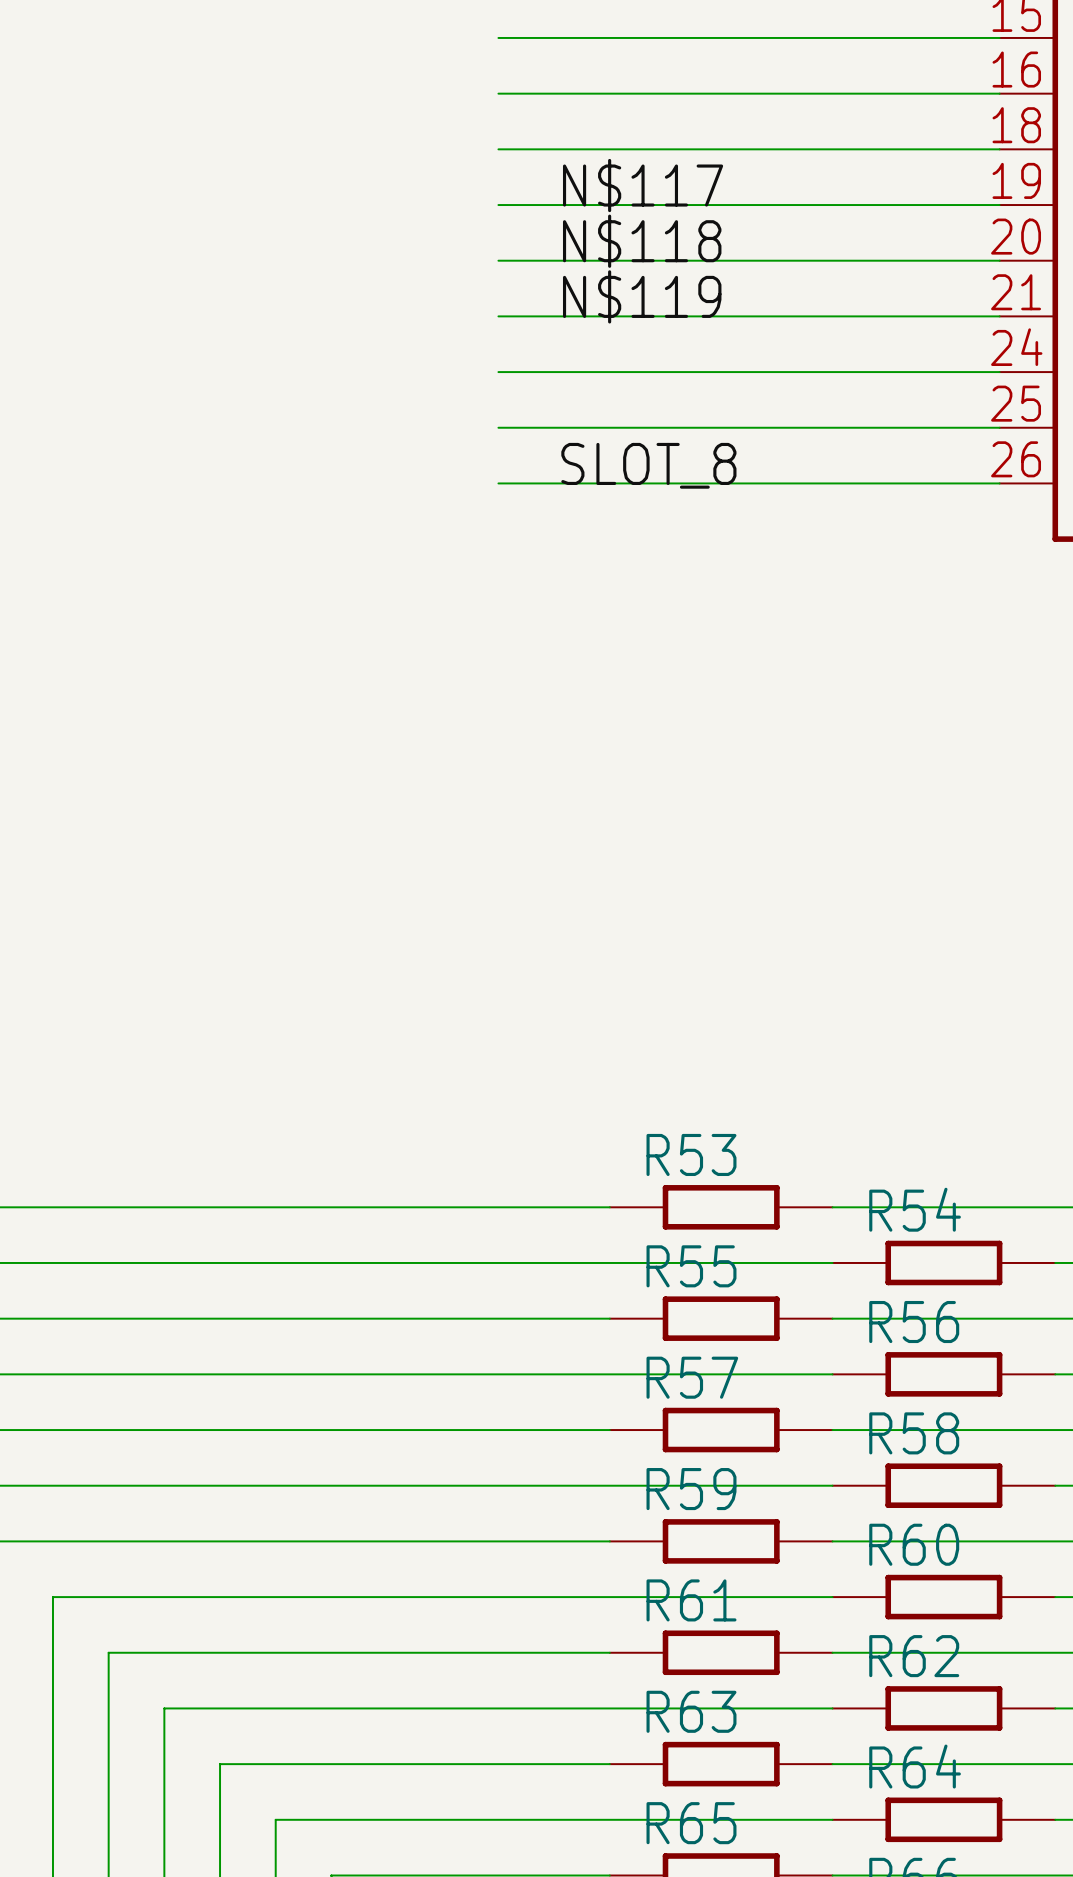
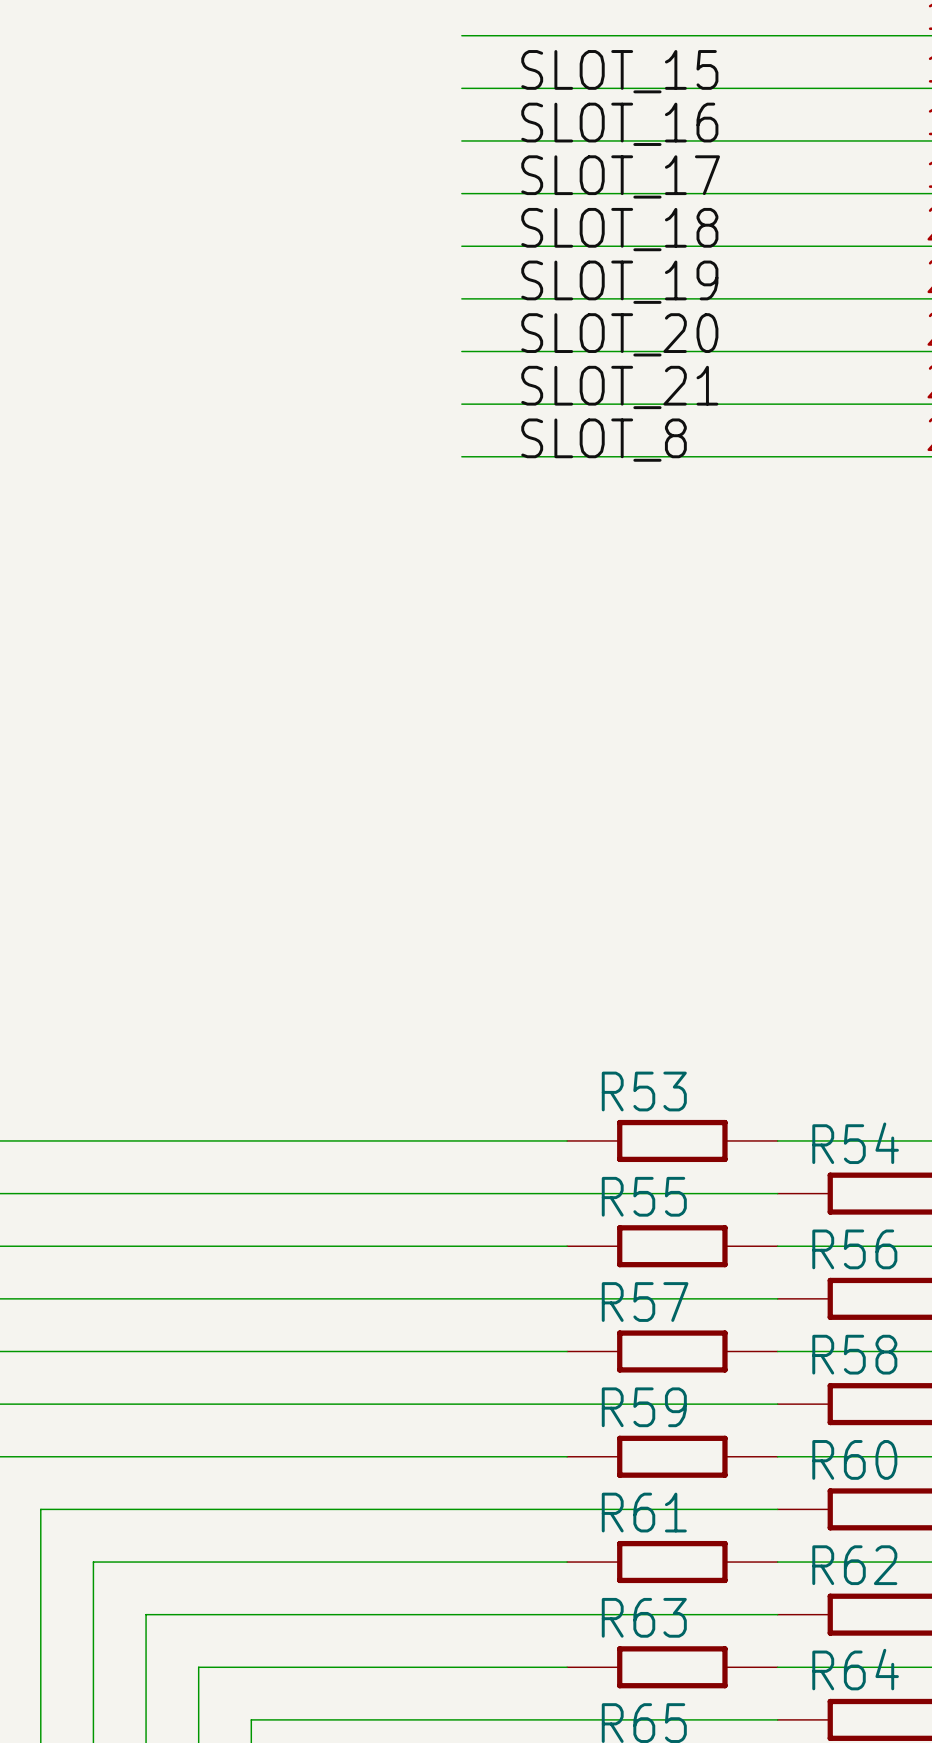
label: none -> SLOT_15 (619, 71)
label: none -> SLOT_16 (619, 124)
label: N$117 (643, 185) -> SLOT_17 (620, 176)
label: N$118 (642, 241) -> SLOT_18 (619, 229)
label: N$119 (642, 296) -> SLOT_19 (619, 282)
label: none -> SLOT_20 (619, 334)
label: none -> SLOT_21 (619, 387)

